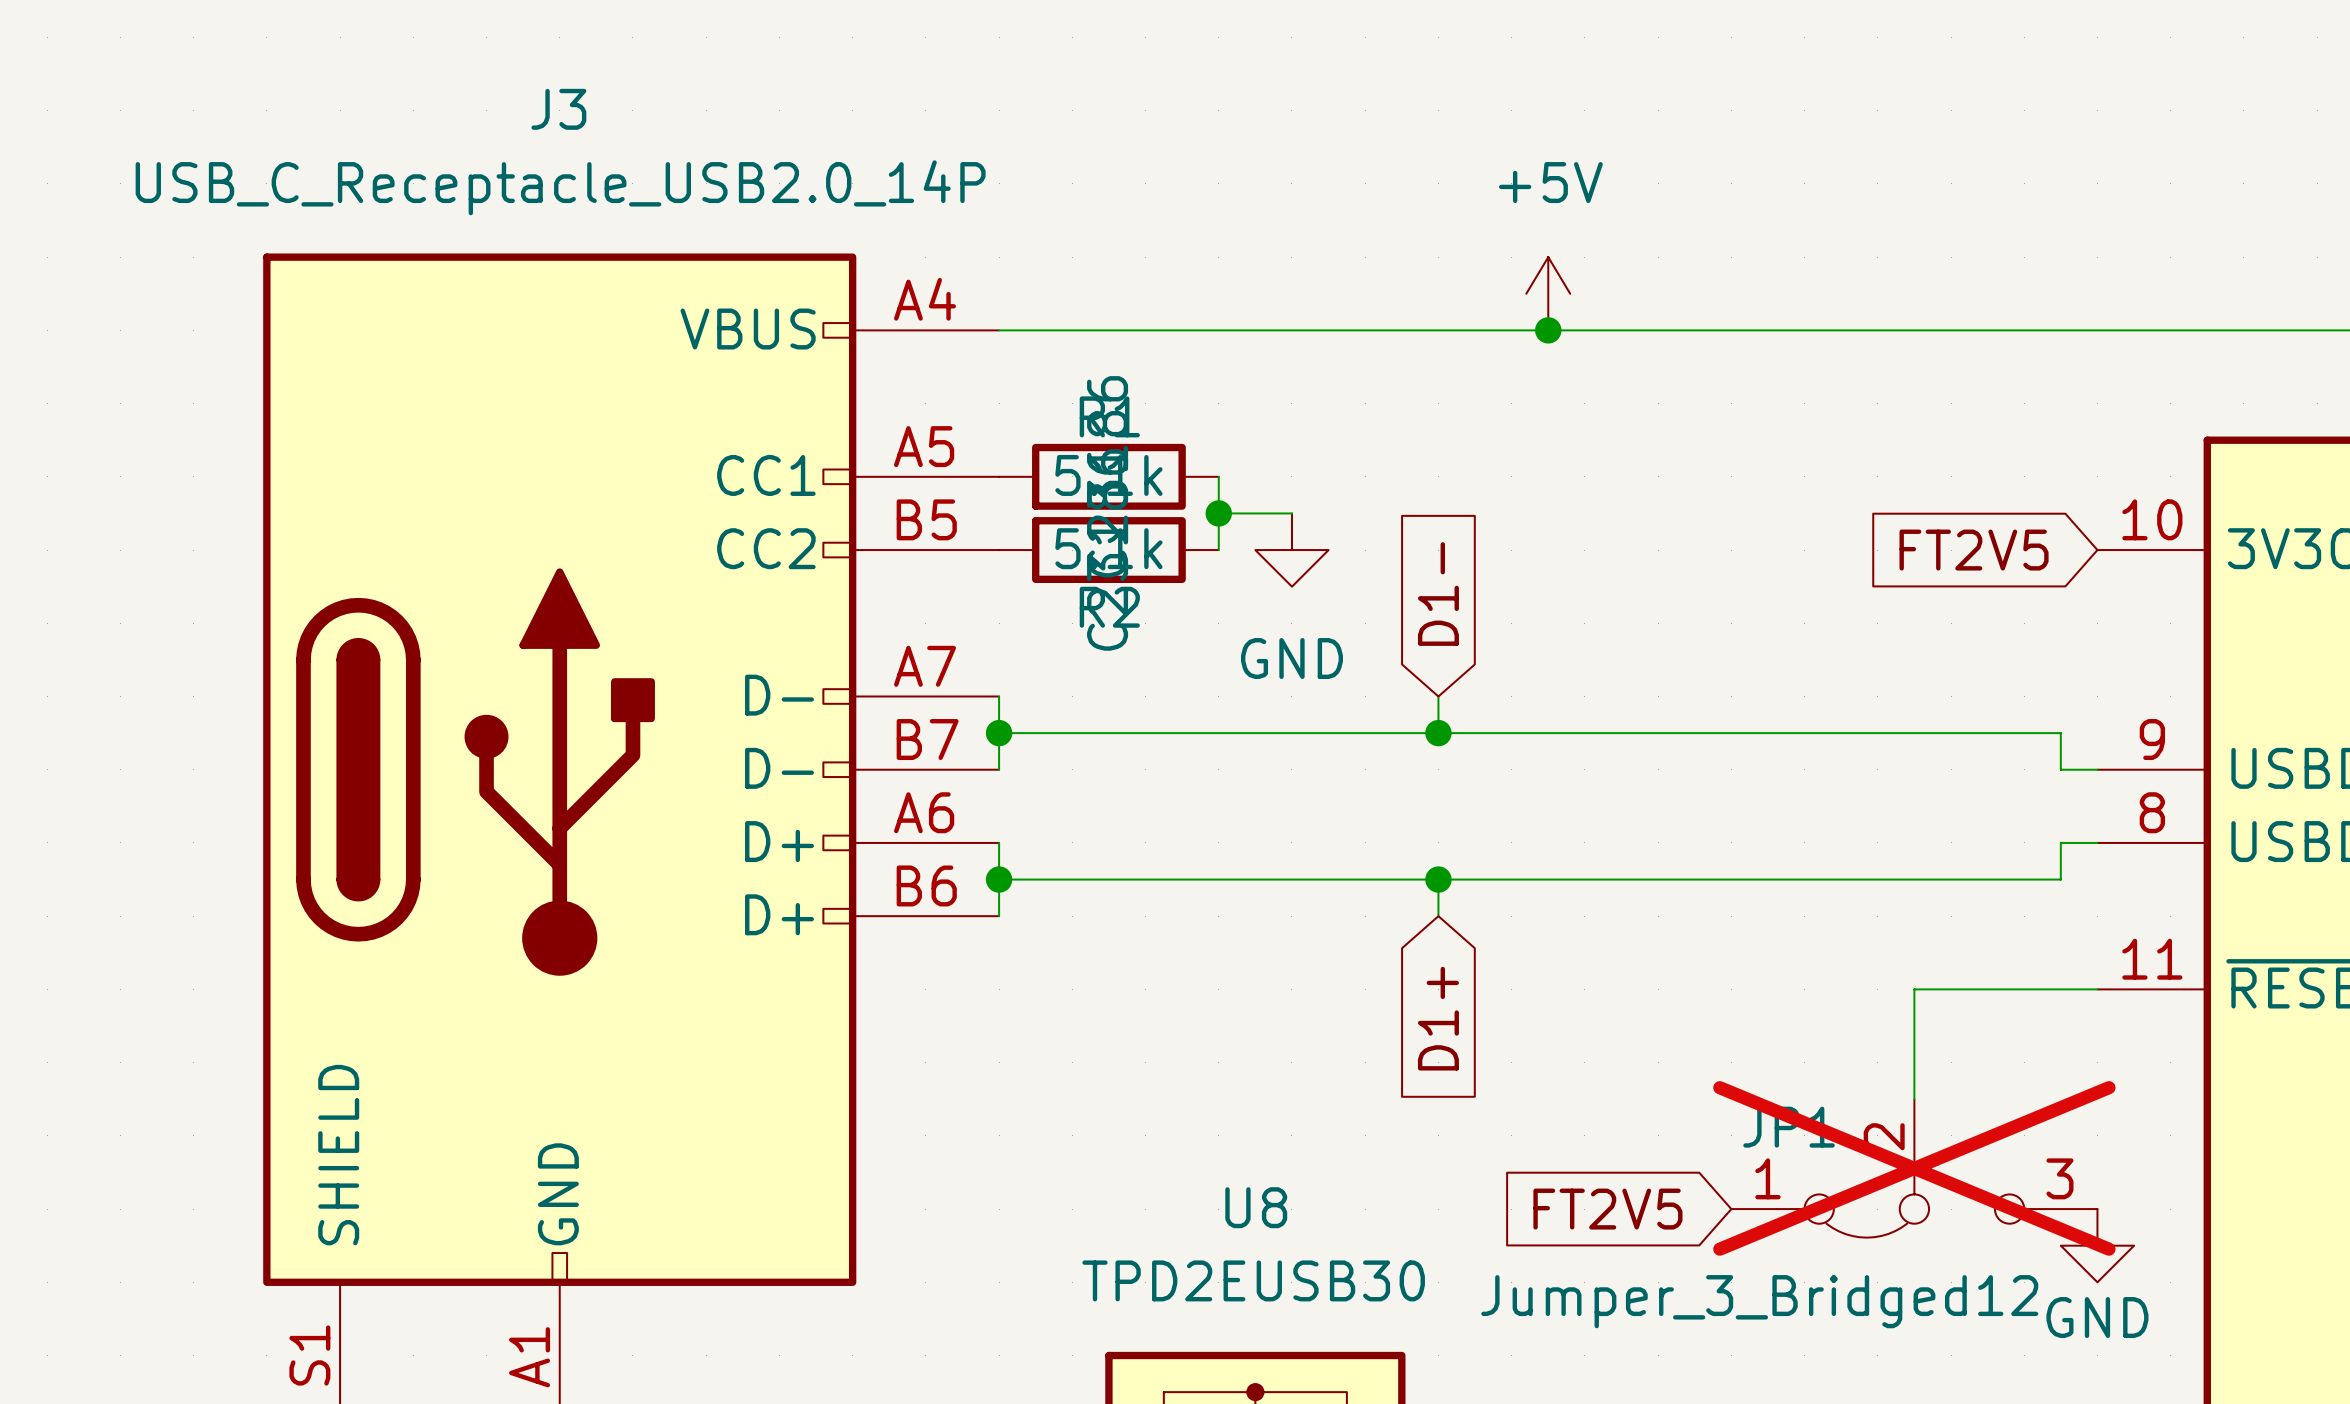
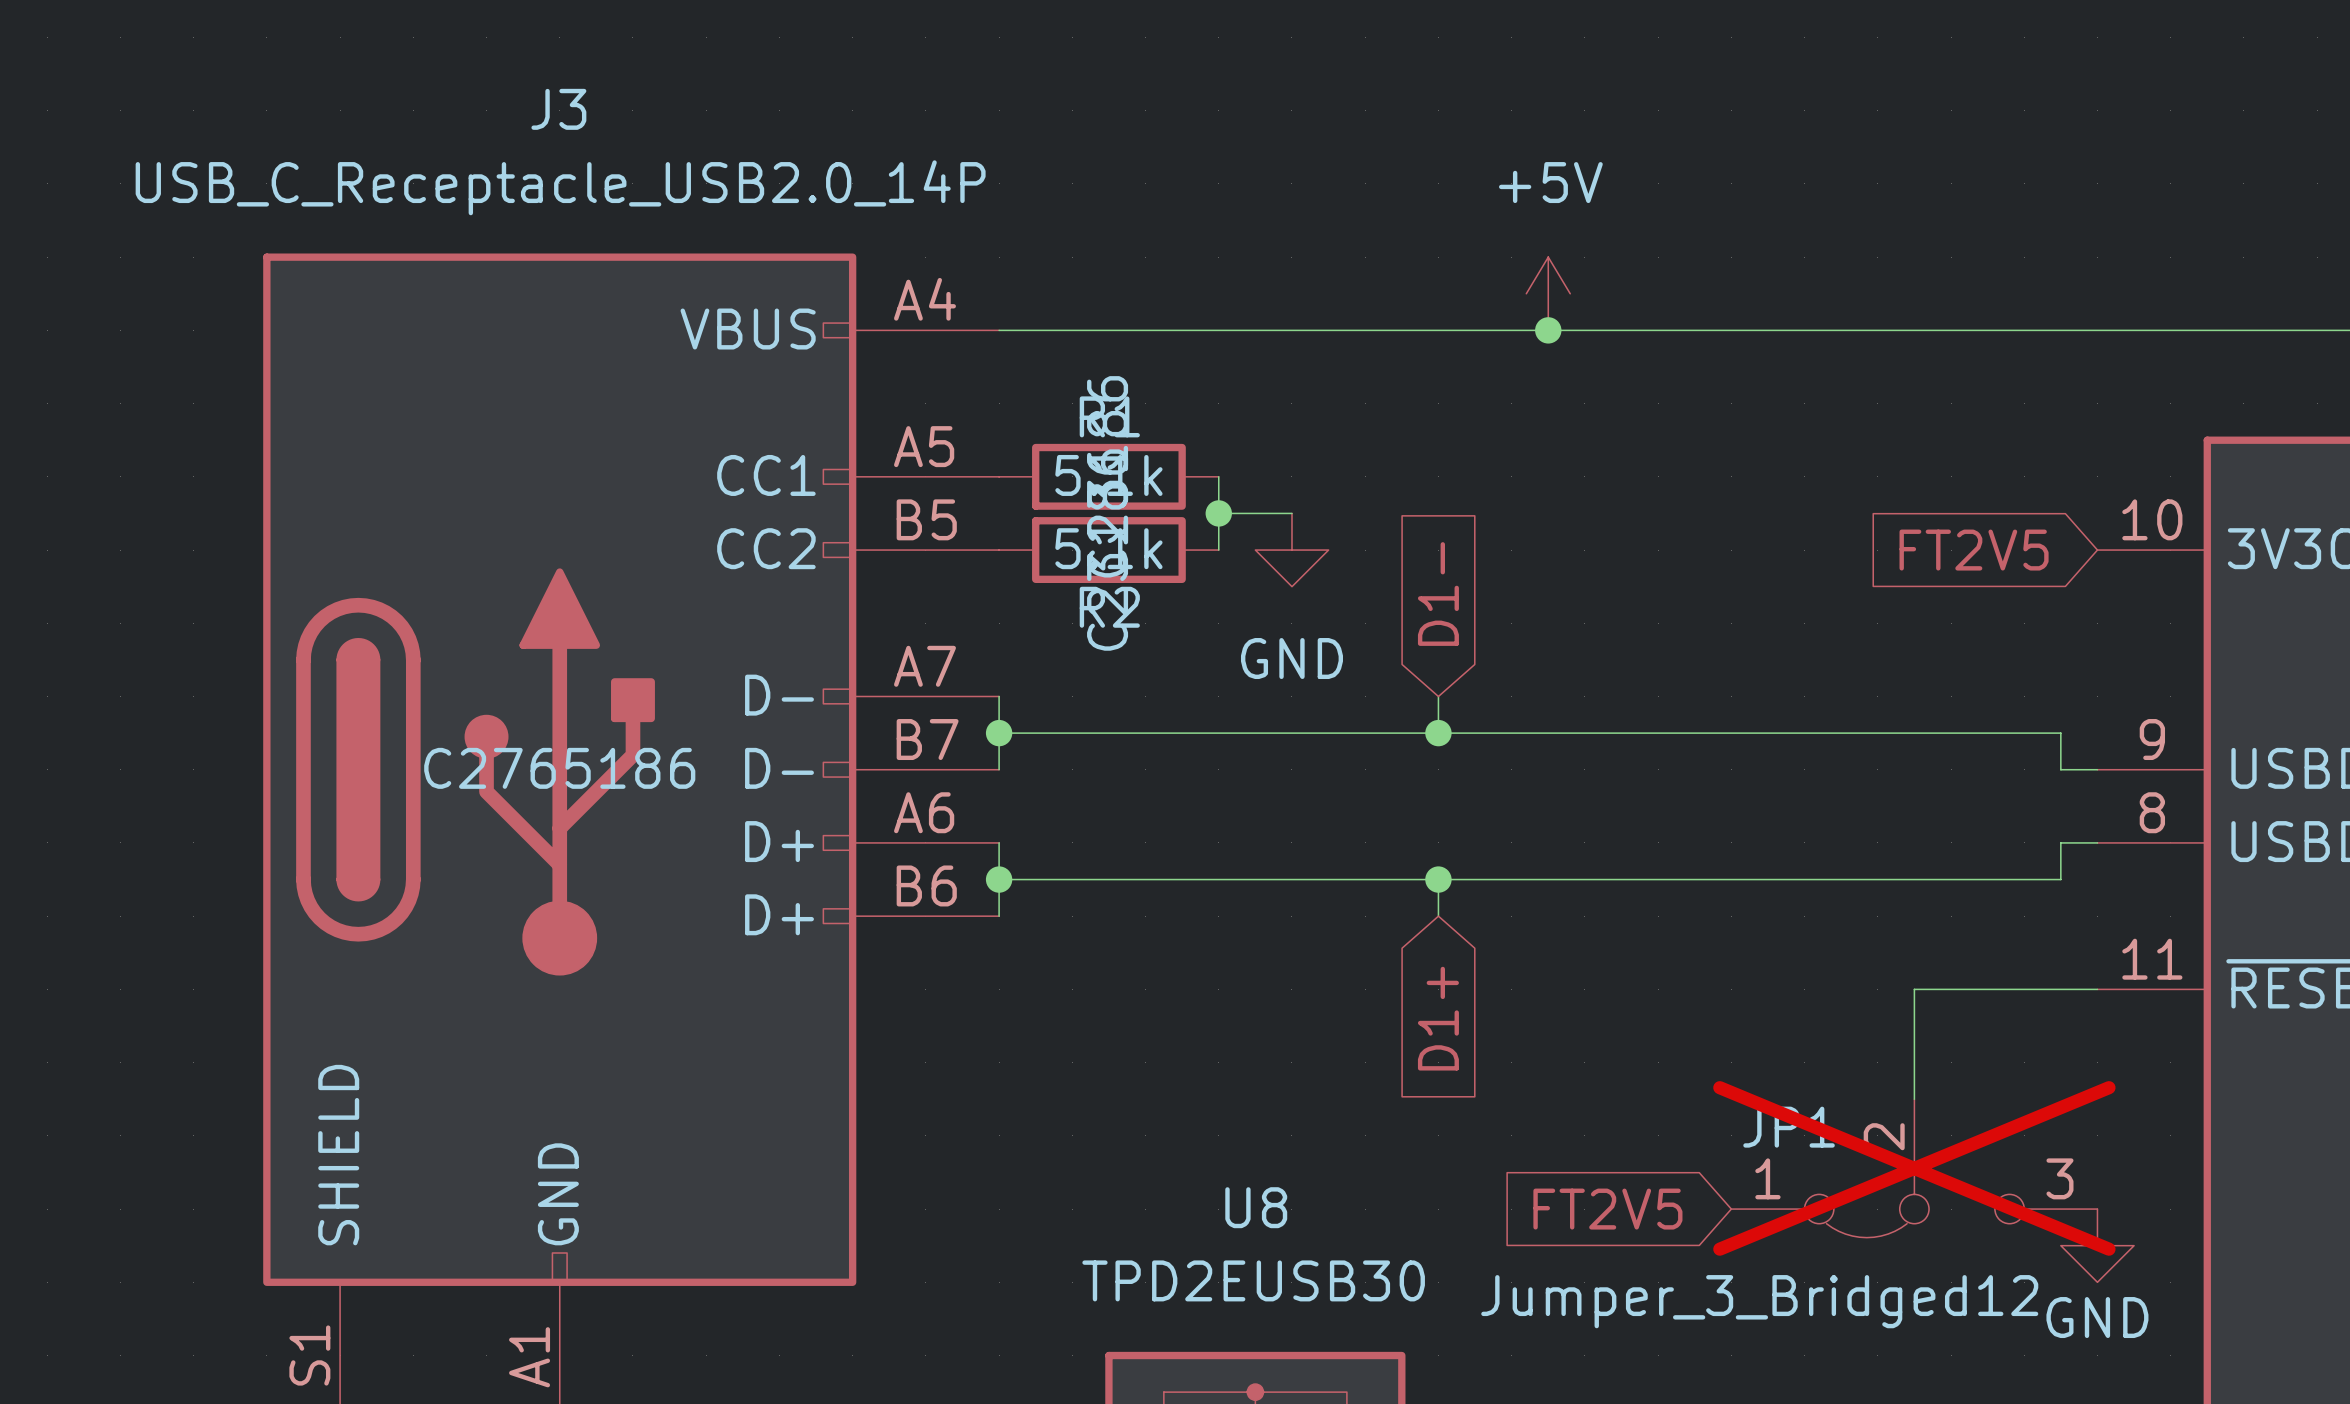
J3 text: none -> C2765186 (559, 768)

